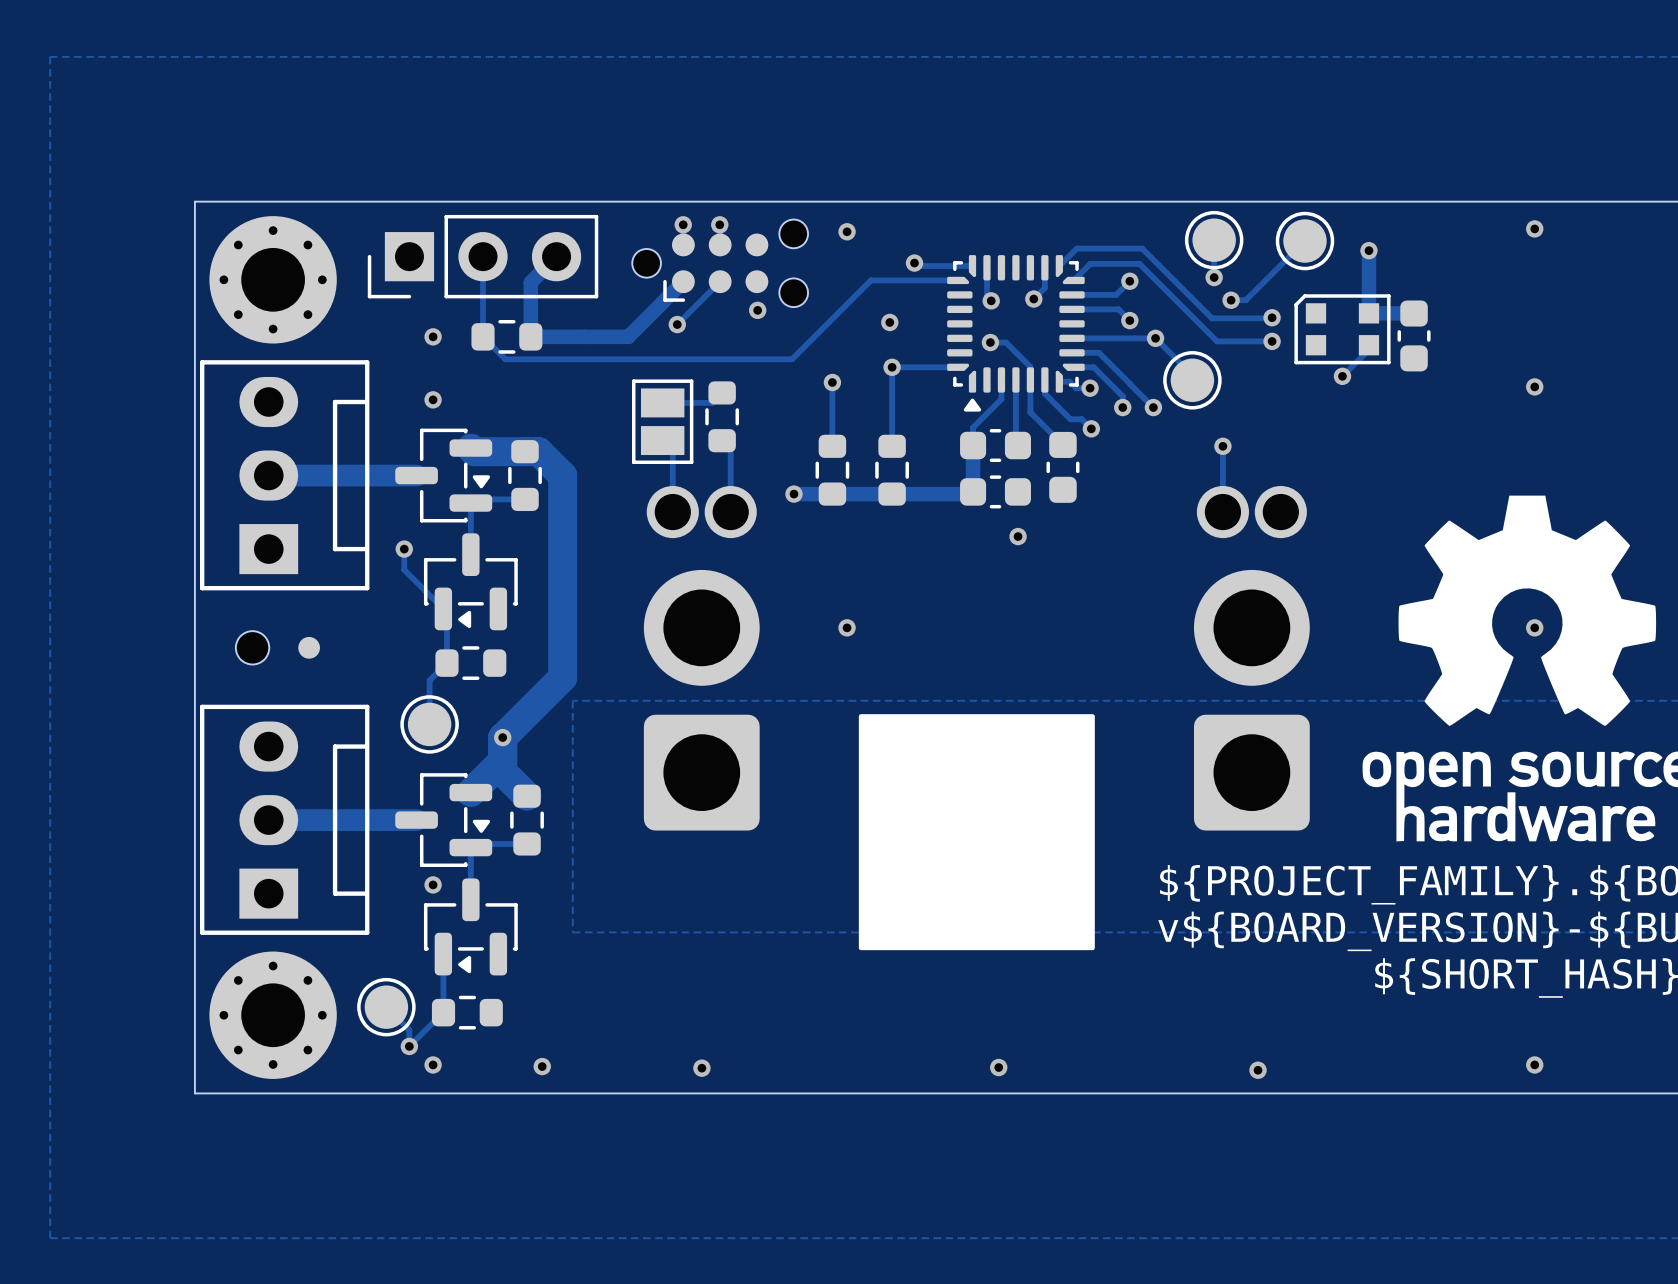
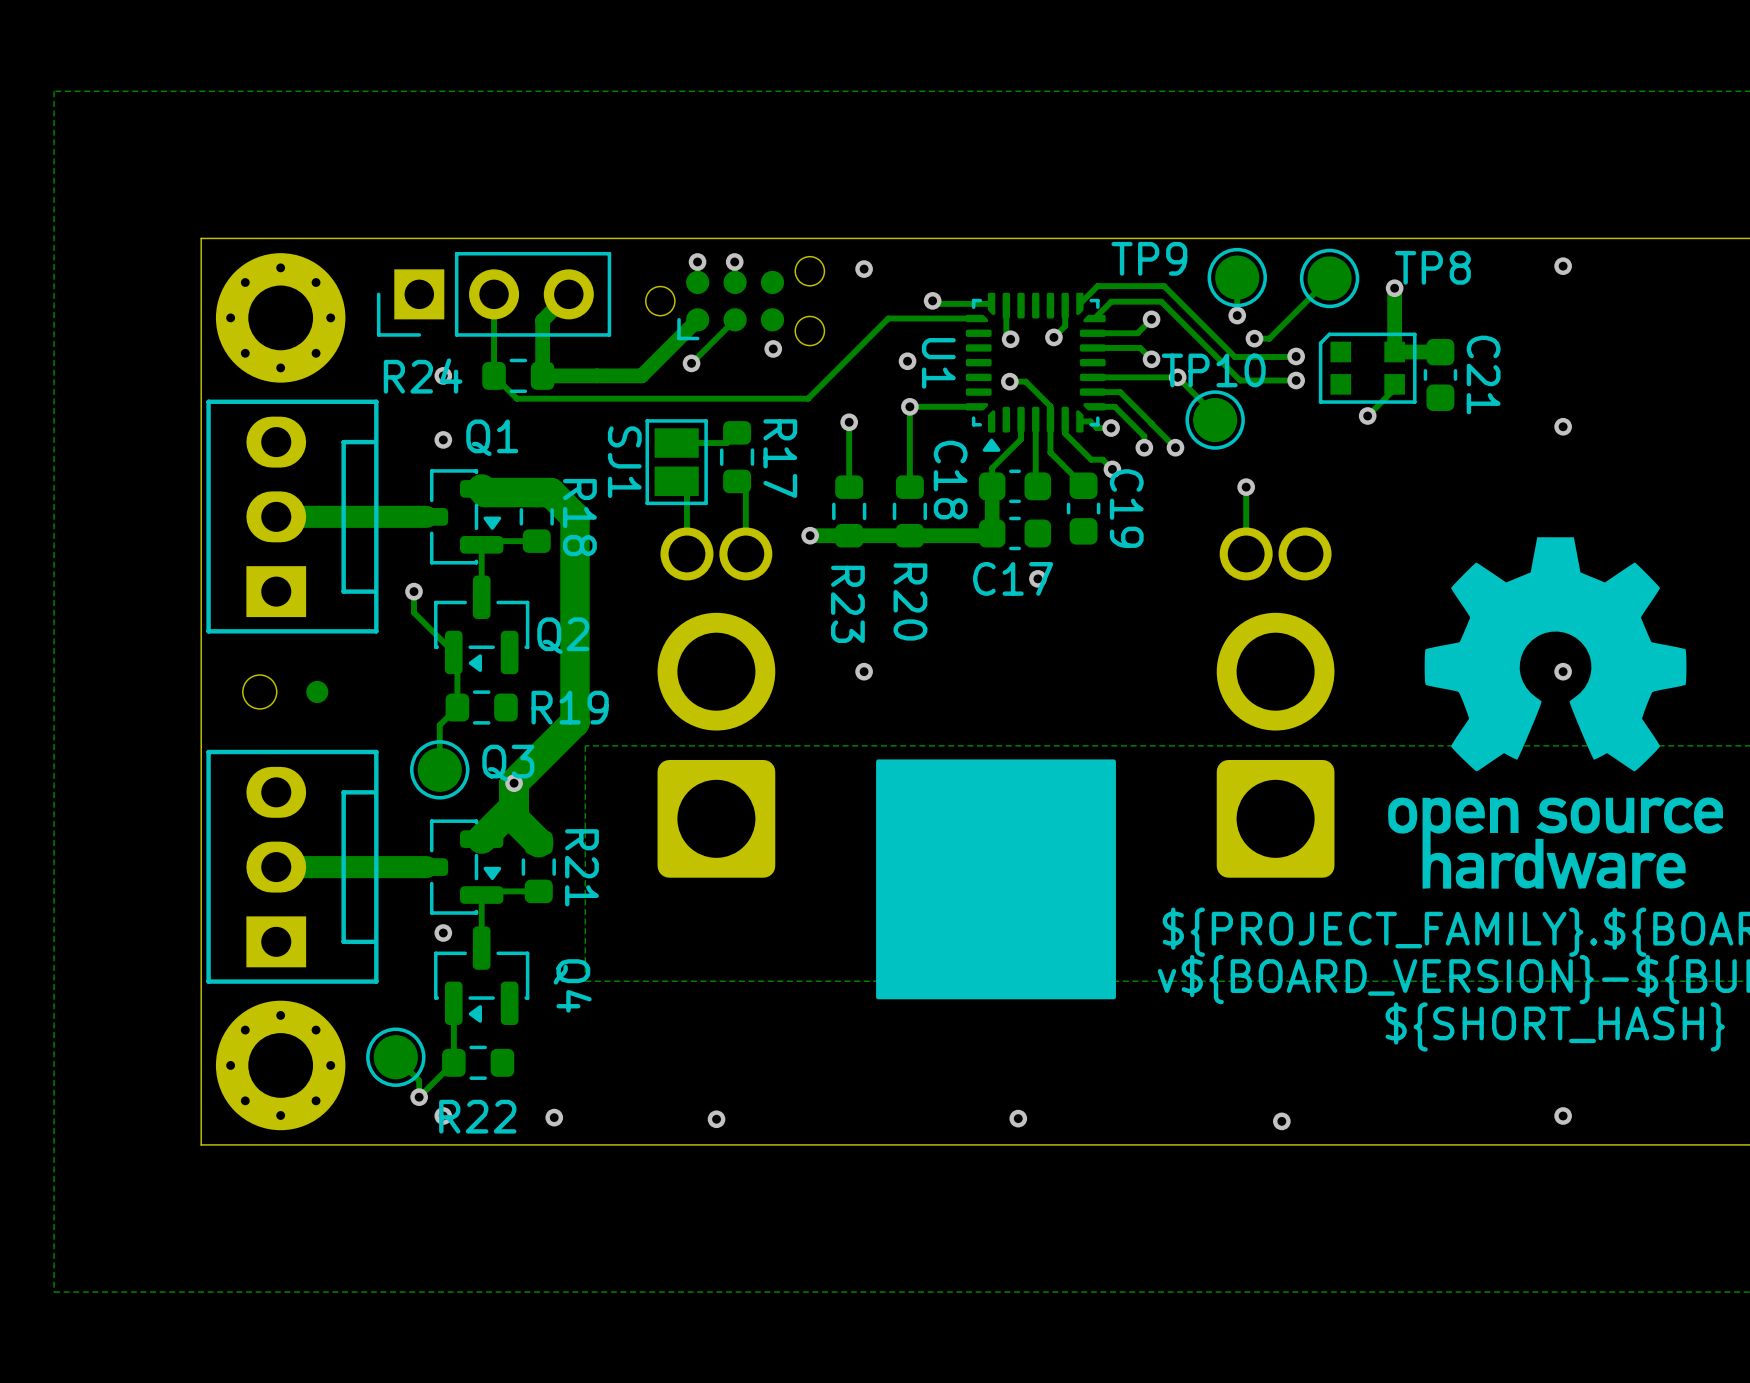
TP9 name: none -> TP9 (1149, 258)
TP8 name: none -> TP8 (1432, 267)
U1 name: none -> U1 (938, 363)
TP10 name: none -> TP10 (1213, 370)
C21 name: none -> C21 (1483, 374)
R24 name: none -> R24 (423, 376)
Q1 name: none -> Q1 (492, 437)
R17 name: none -> R17 (780, 458)
SJ1 name: none -> SJ1 (624, 462)
C18 name: none -> C18 (950, 480)
C19 name: none -> C19 (1126, 508)
R18 name: none -> R18 (579, 517)
C17 name: none -> C17 (1013, 578)
R20 name: none -> R20 (910, 601)
R23 name: none -> R23 (847, 604)
Q2 name: none -> Q2 (563, 635)
R19 name: none -> R19 (570, 707)
Q3 name: none -> Q3 (508, 763)
R21 name: none -> R21 (581, 867)
Q4 name: none -> Q4 (572, 985)
R22 name: none -> R22 (477, 1116)

